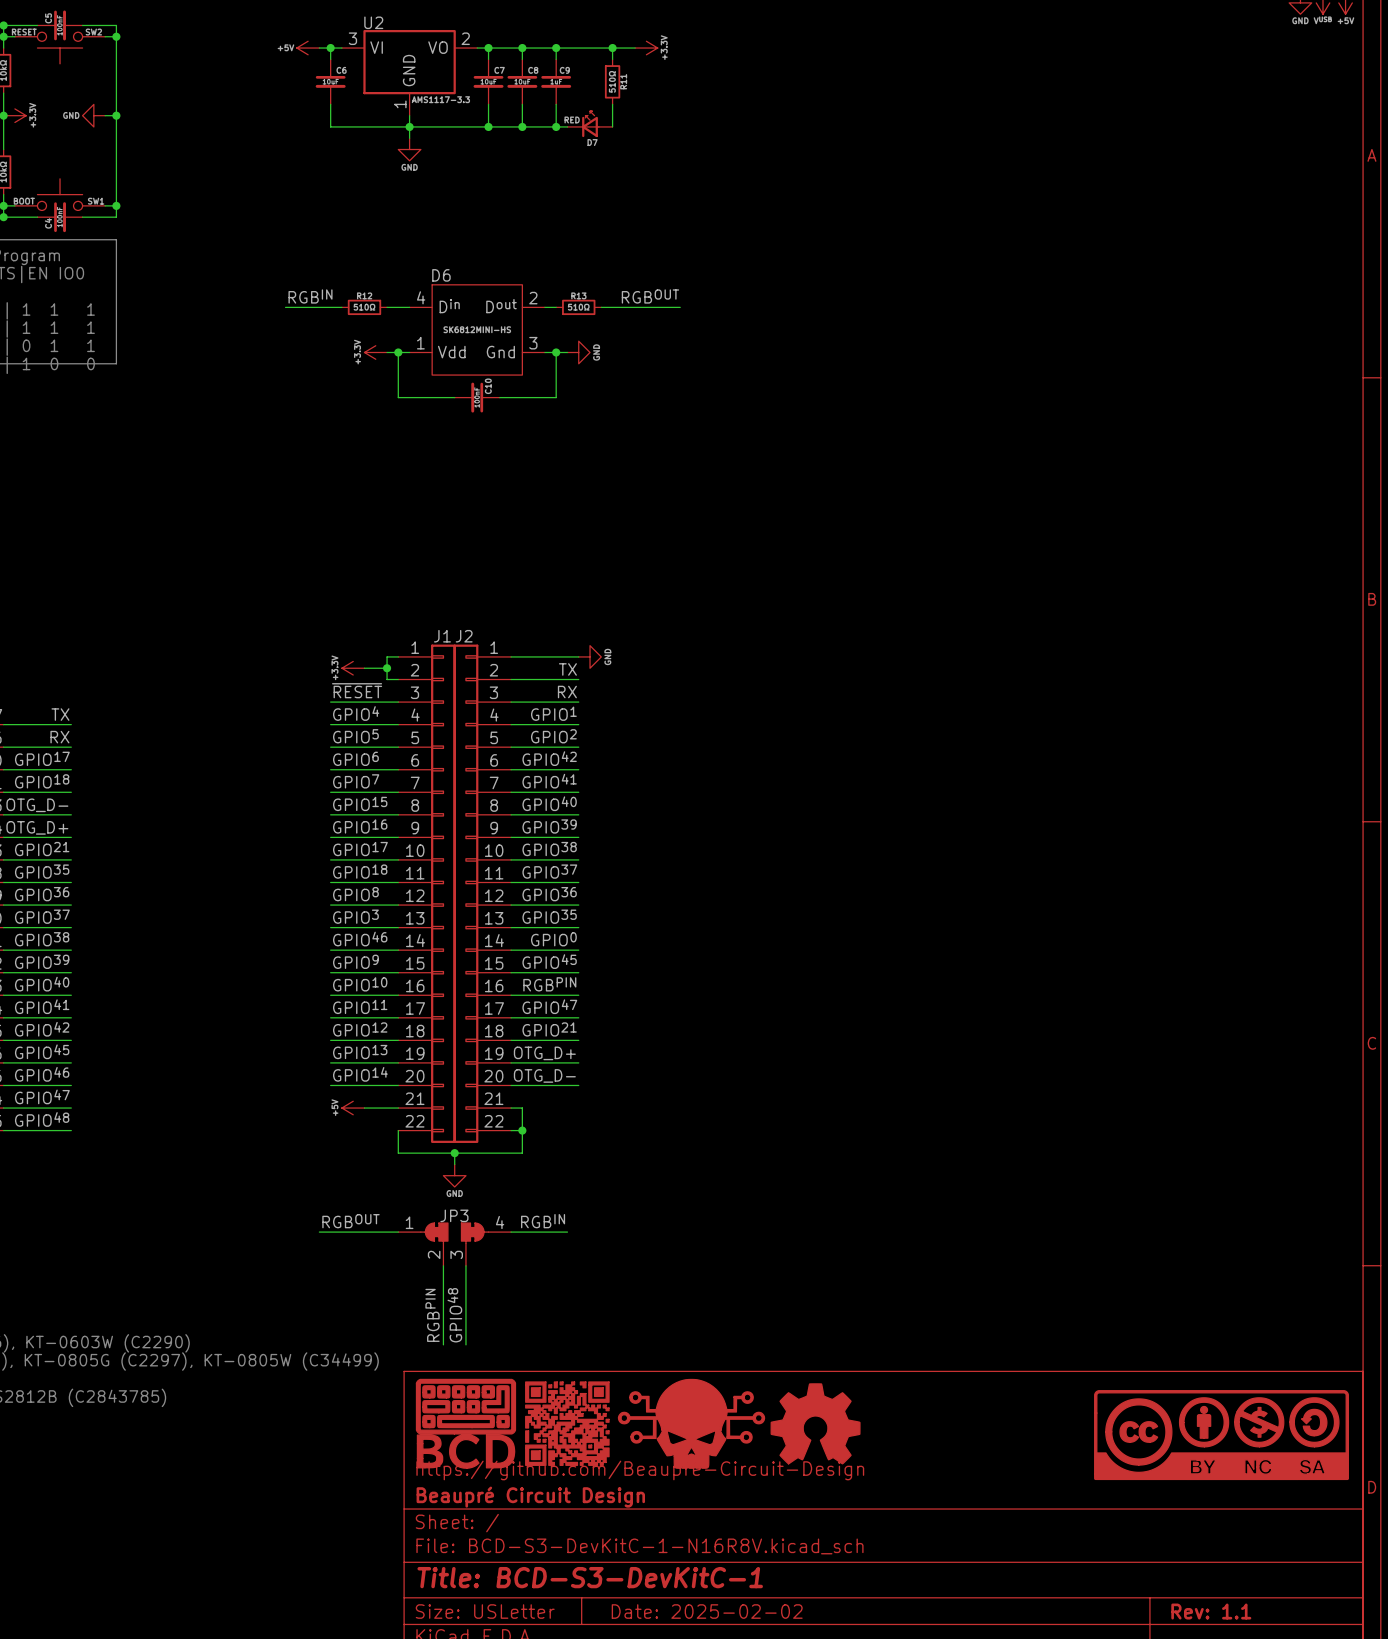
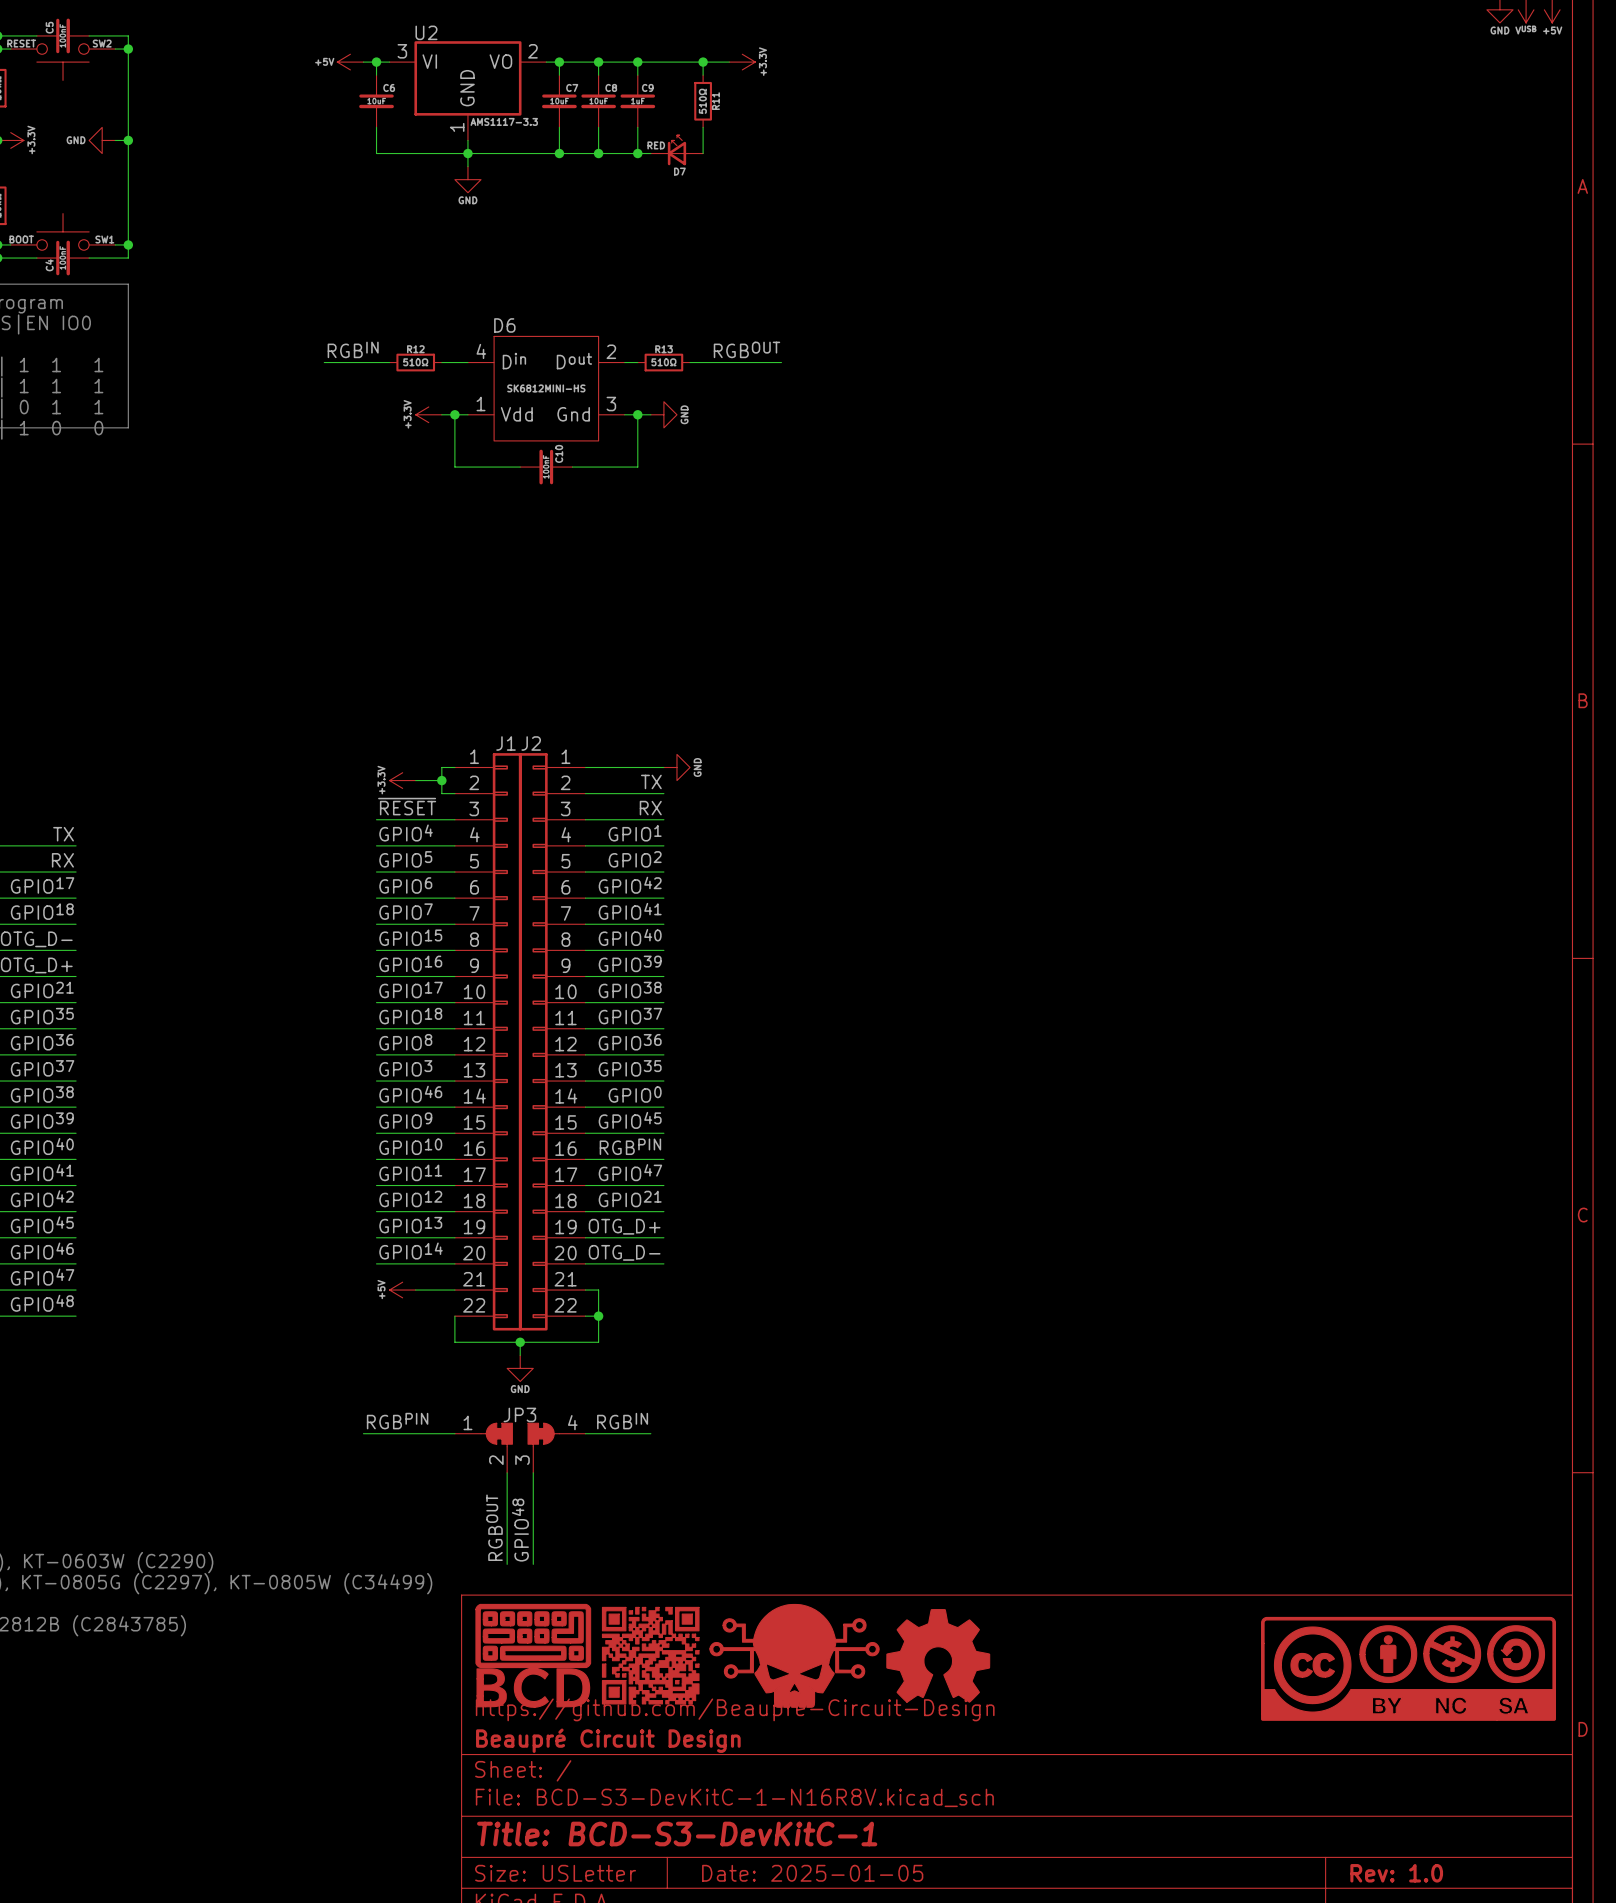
label: RGBOUT (350, 1221) -> RGBPIN (397, 1421)
label: RGBPIN (432, 1315) -> RGBOUT (494, 1527)
title block: Date: 2025-02-02 (707, 1611) -> Date: 2025-01-05 (812, 1873)
title block: Rev: 1.1 (1211, 1611) -> Rev: 1.0 (1396, 1873)

